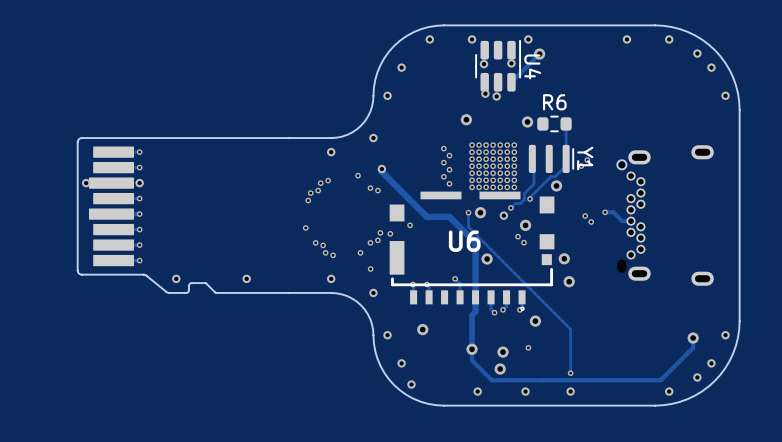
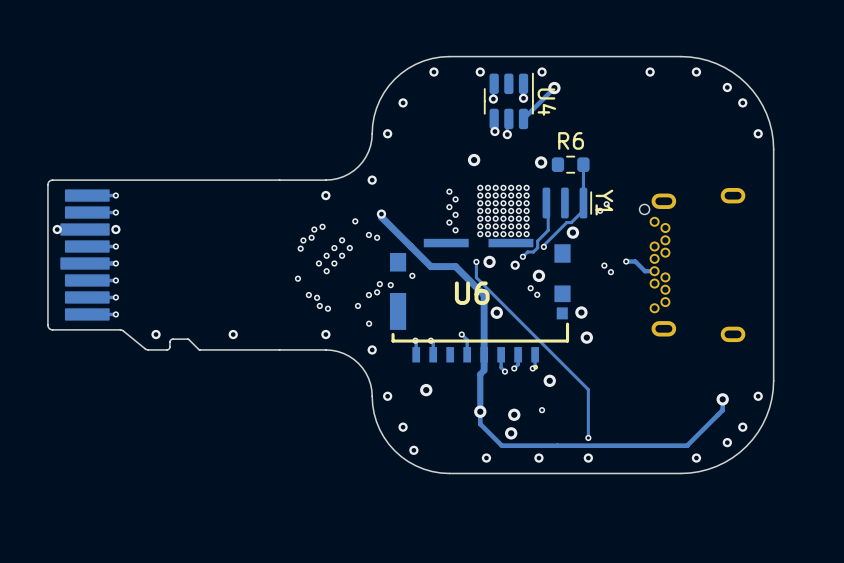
via: none -> (342, 240)
via: none -> (334, 248)
via: none -> (349, 248)
via: none -> (326, 255)
via: none -> (342, 255)
via: none -> (318, 263)
via: none -> (334, 263)
via: none -> (326, 271)

